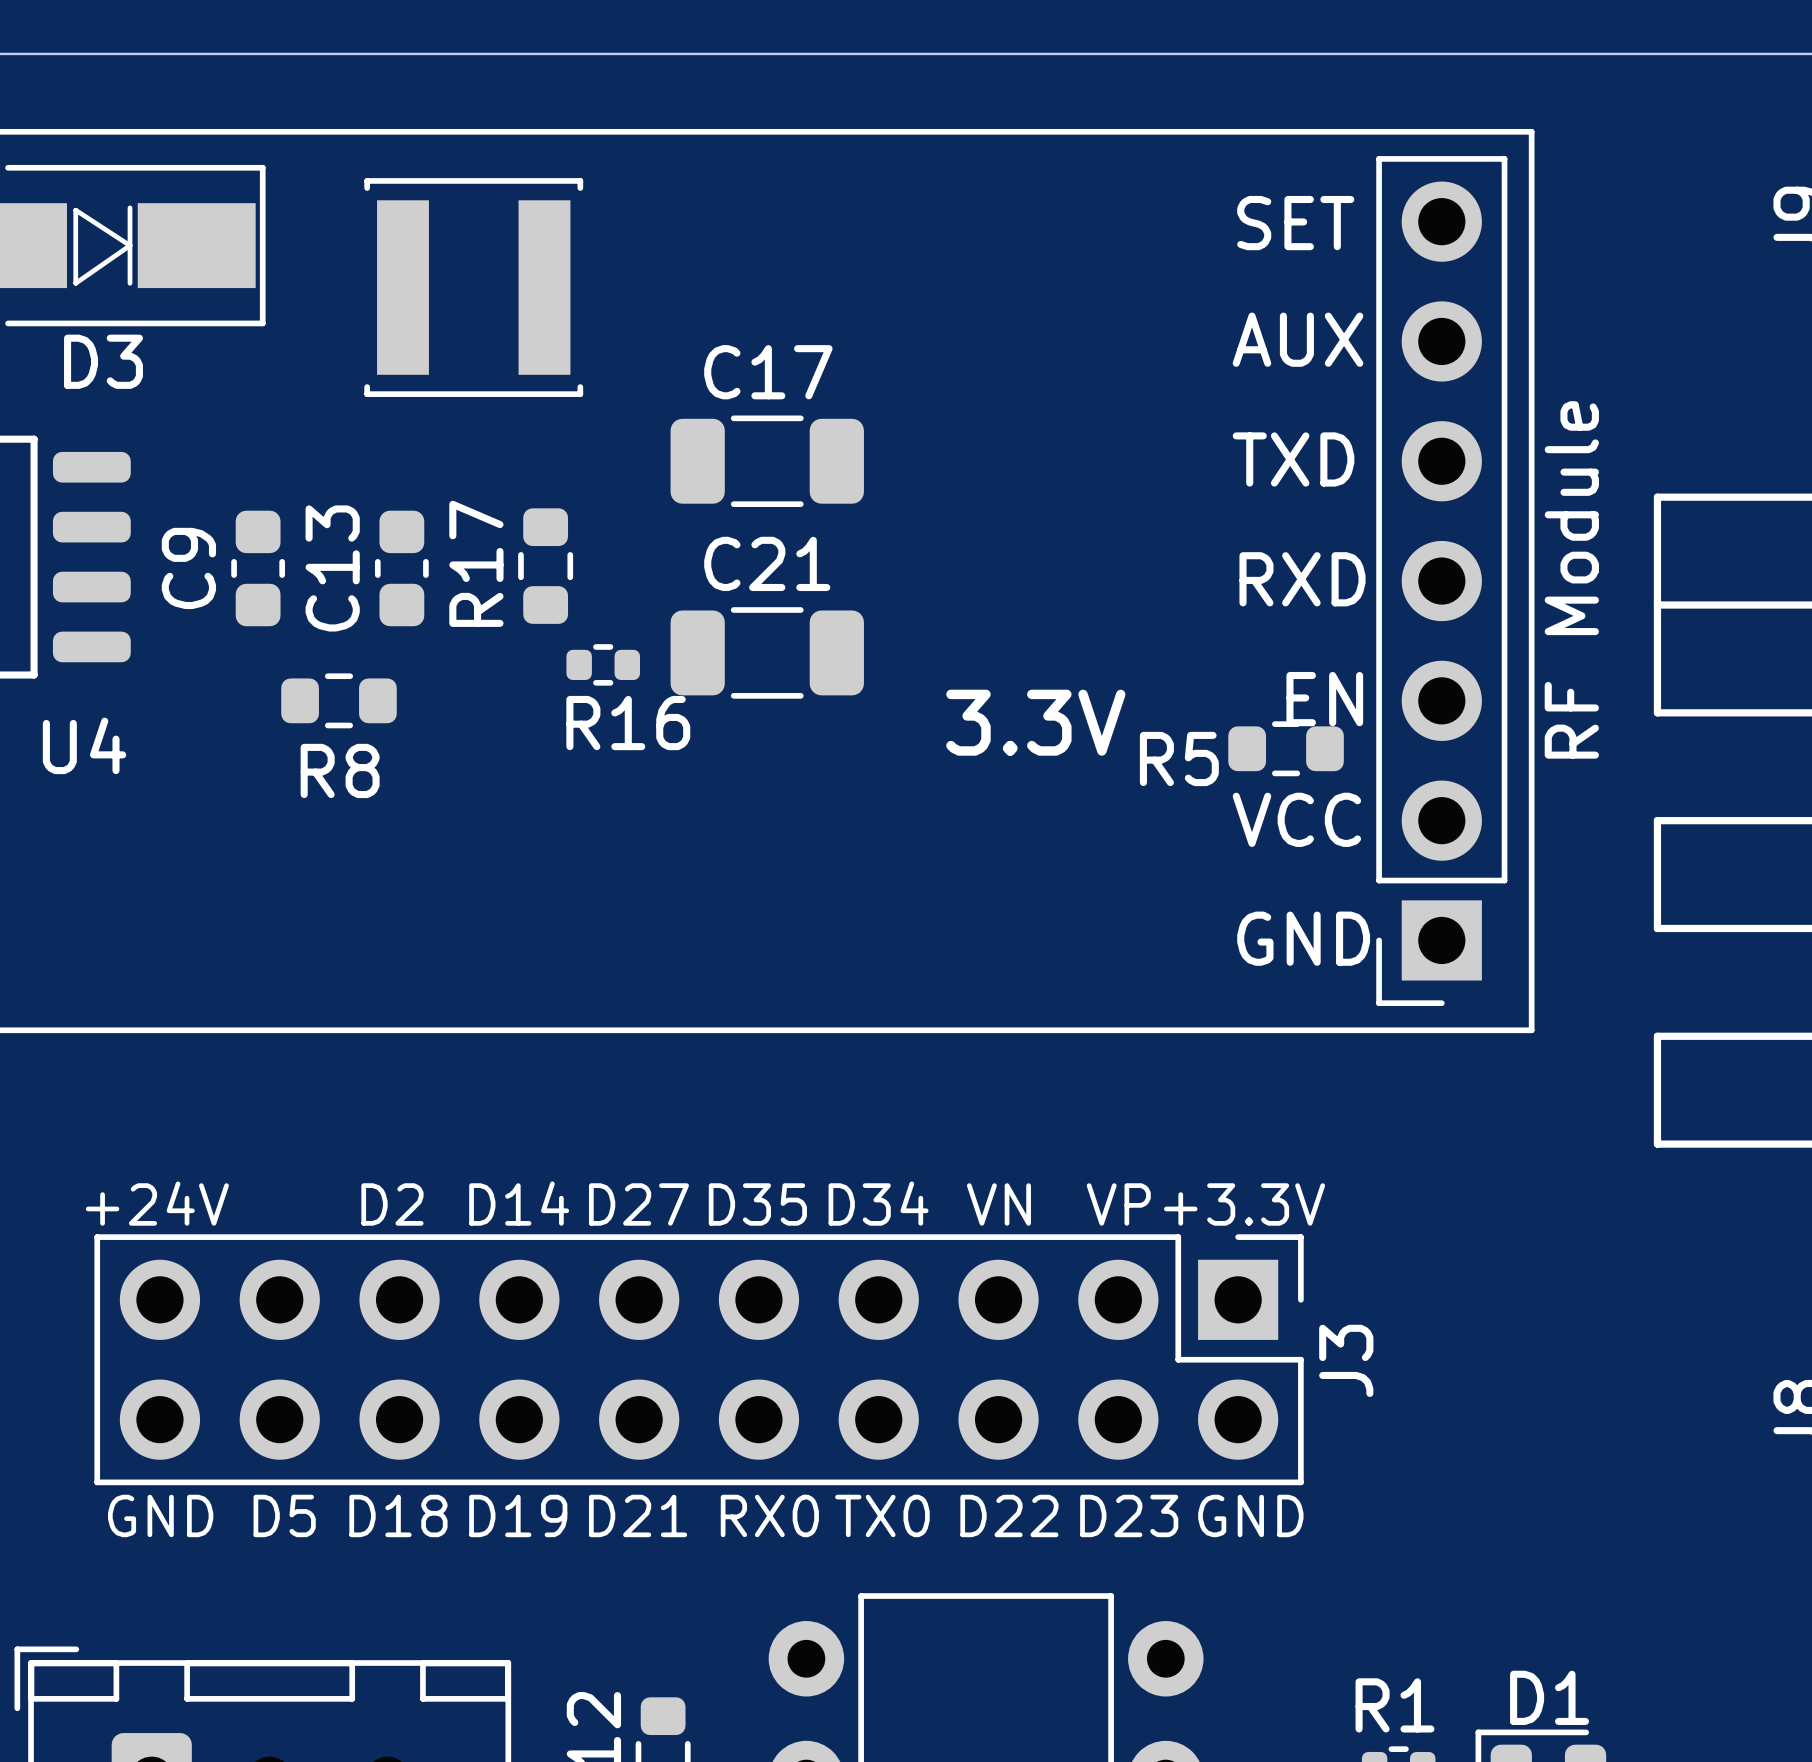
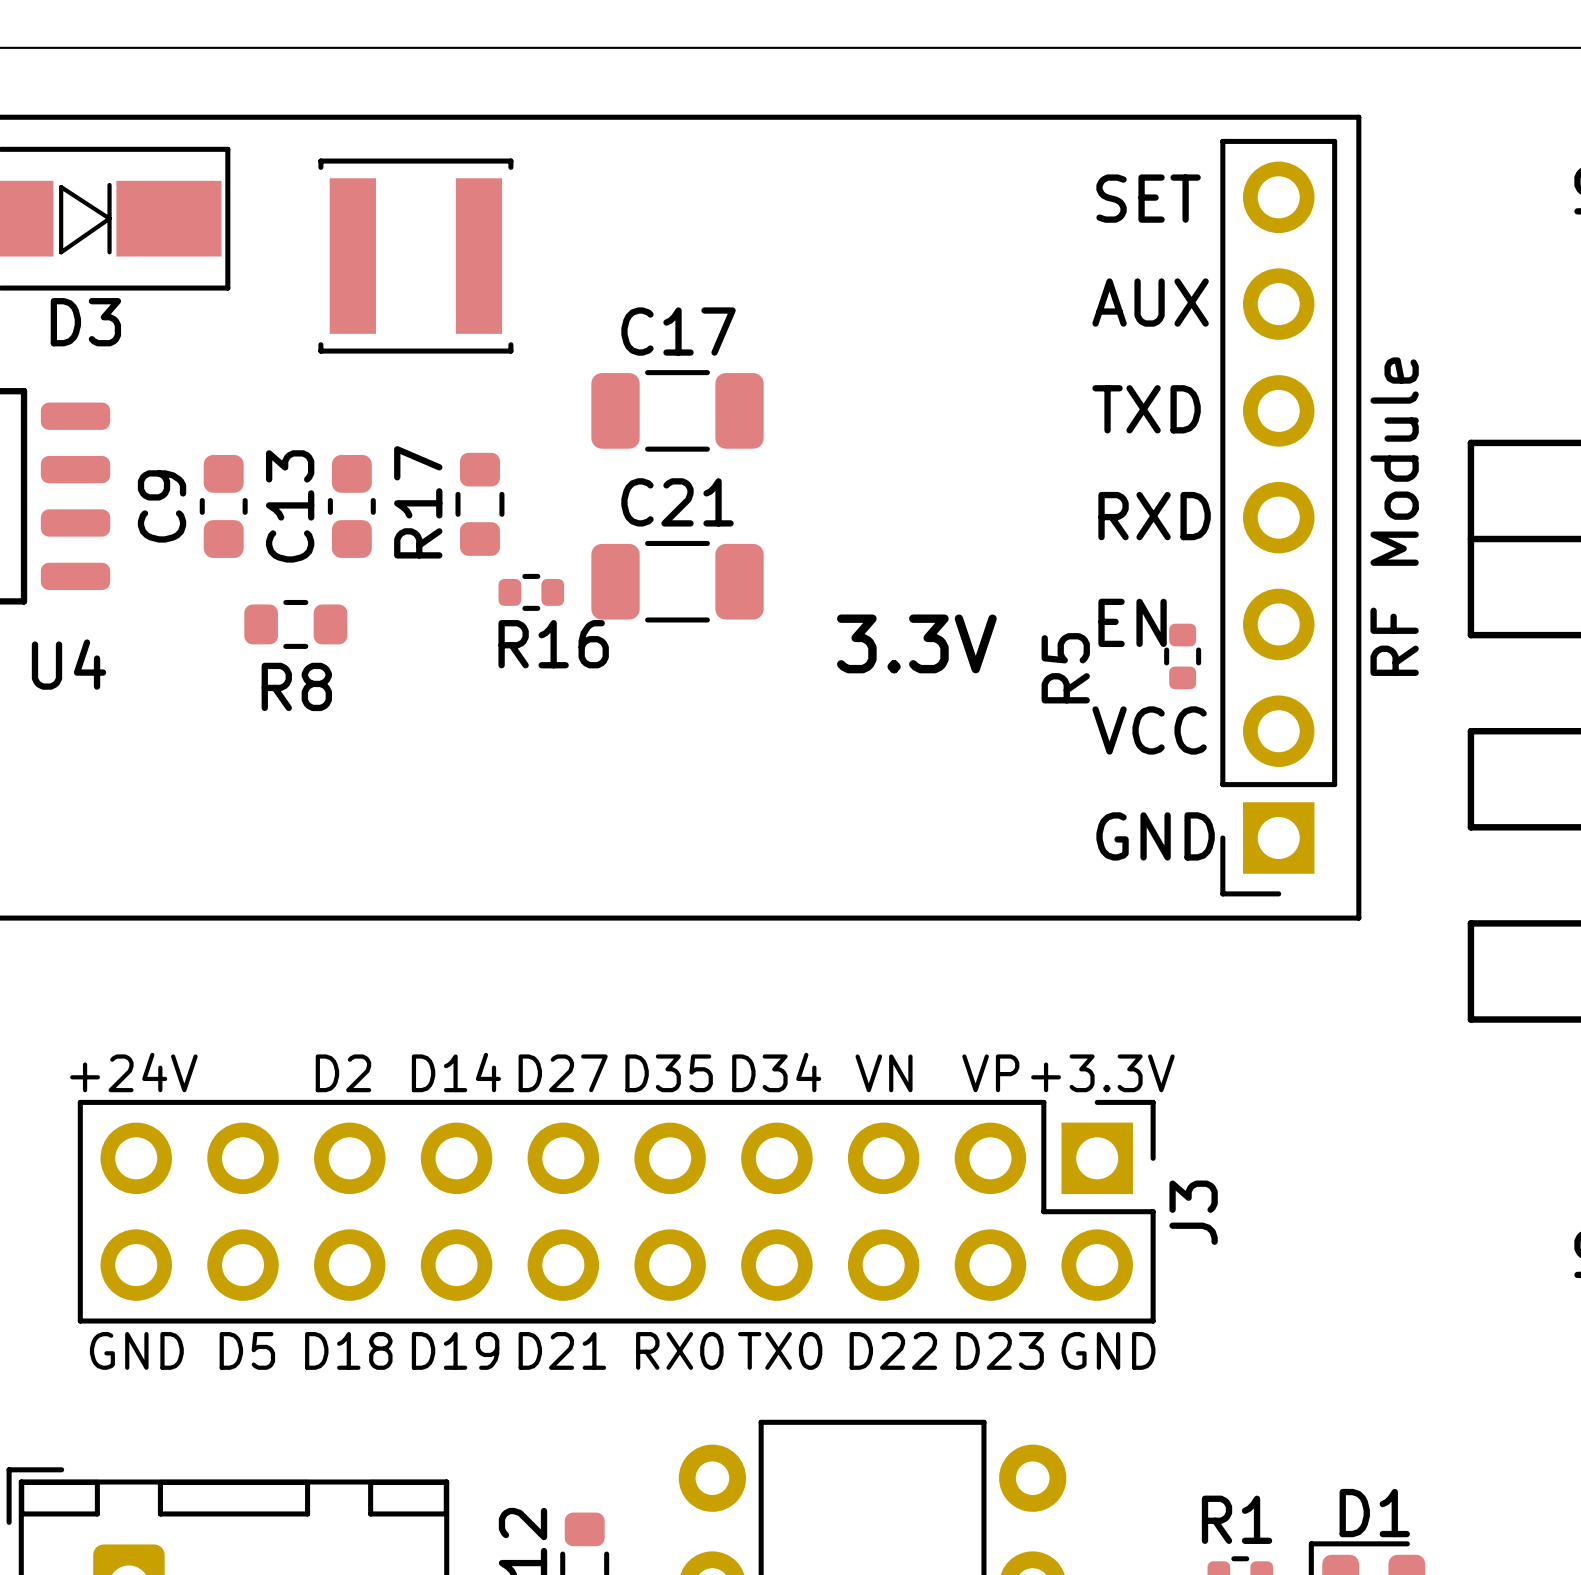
part text position: EN (1324, 699) -> EN (1132, 622)
R5 footprint: [1228, 721, 1344, 777] -> [1164, 623, 1202, 690]

